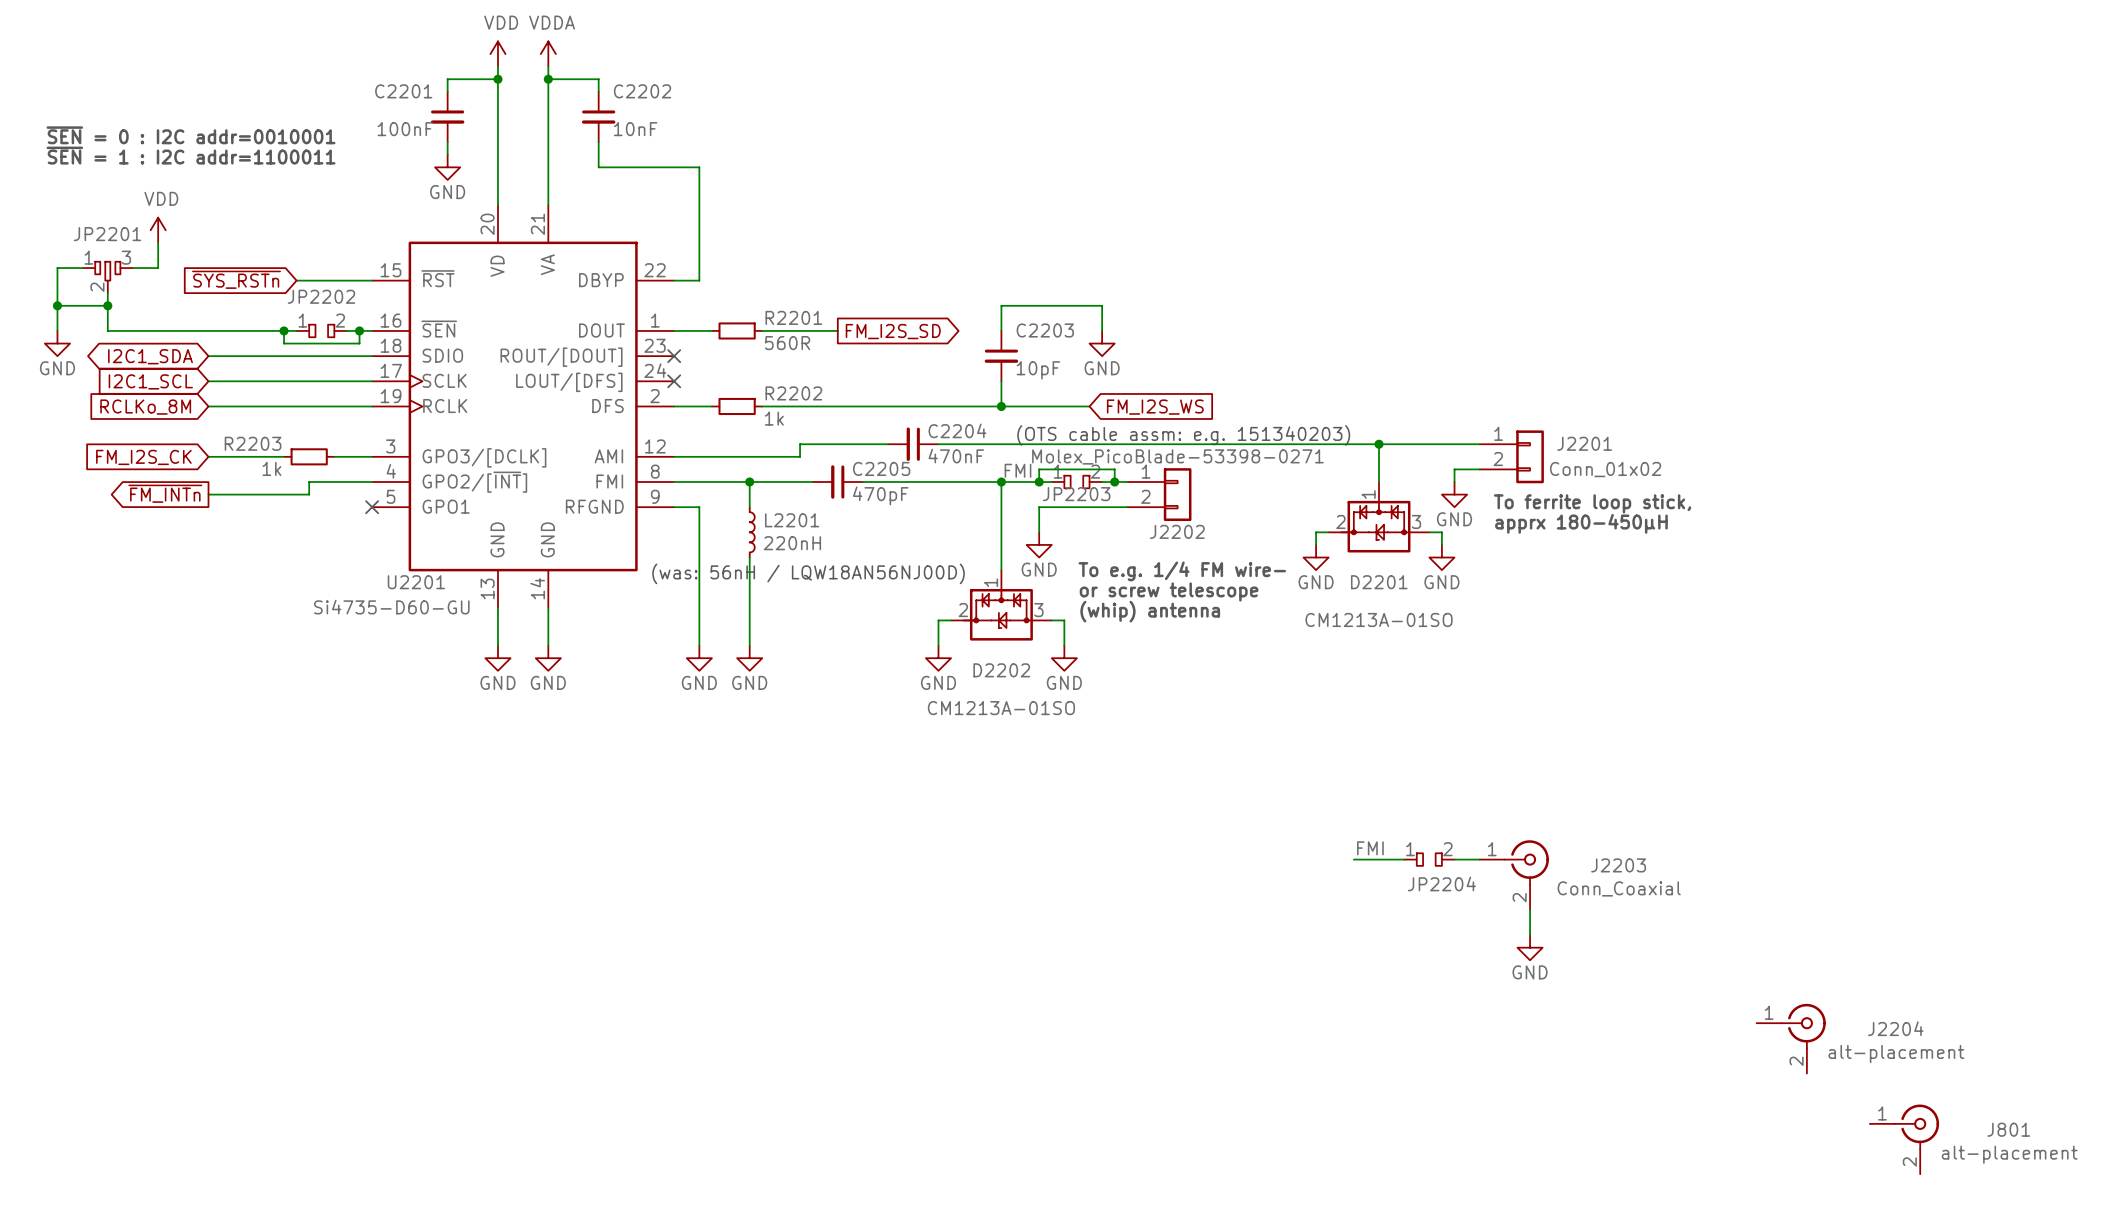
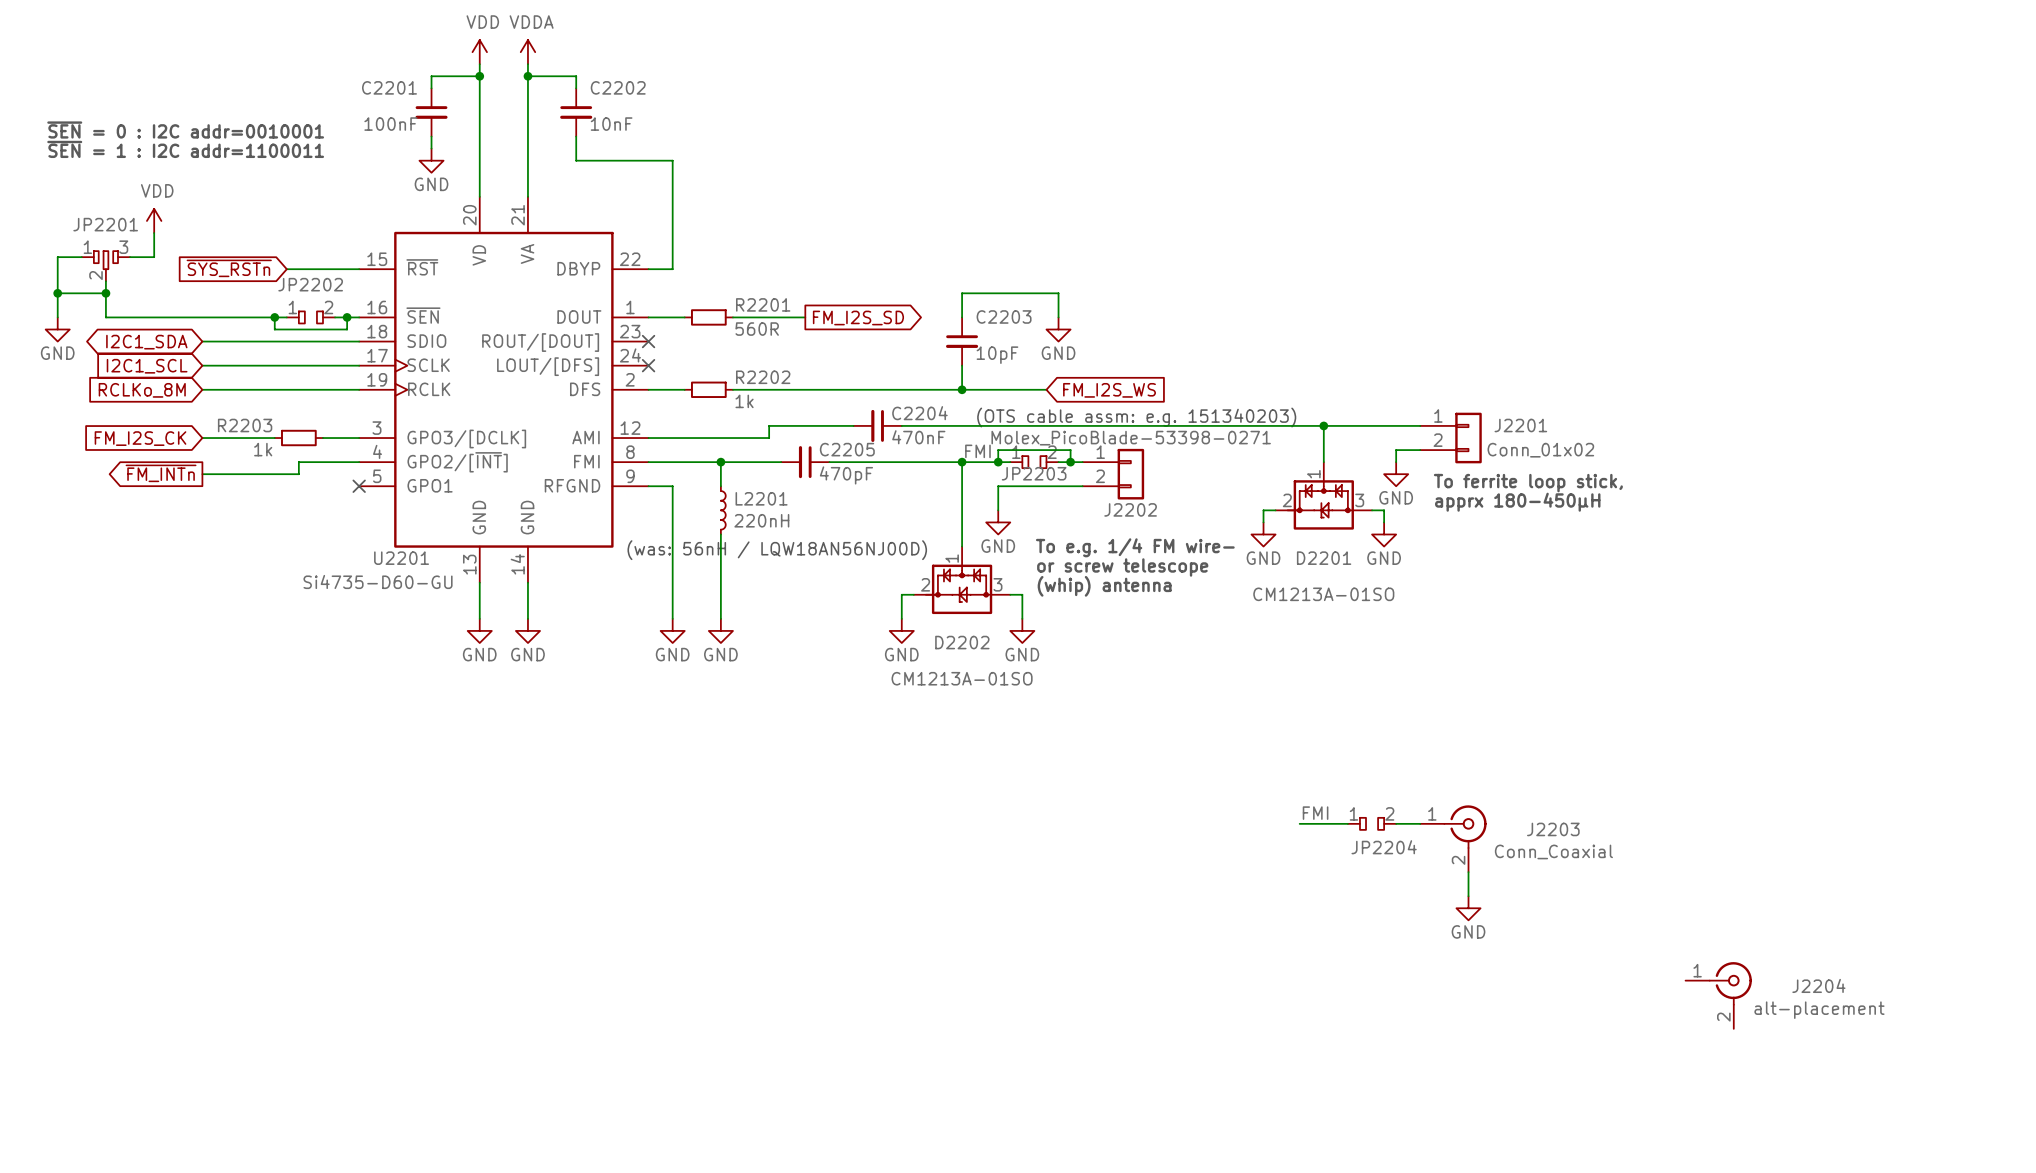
J801: alt-placement (1904, 1139) -> none

